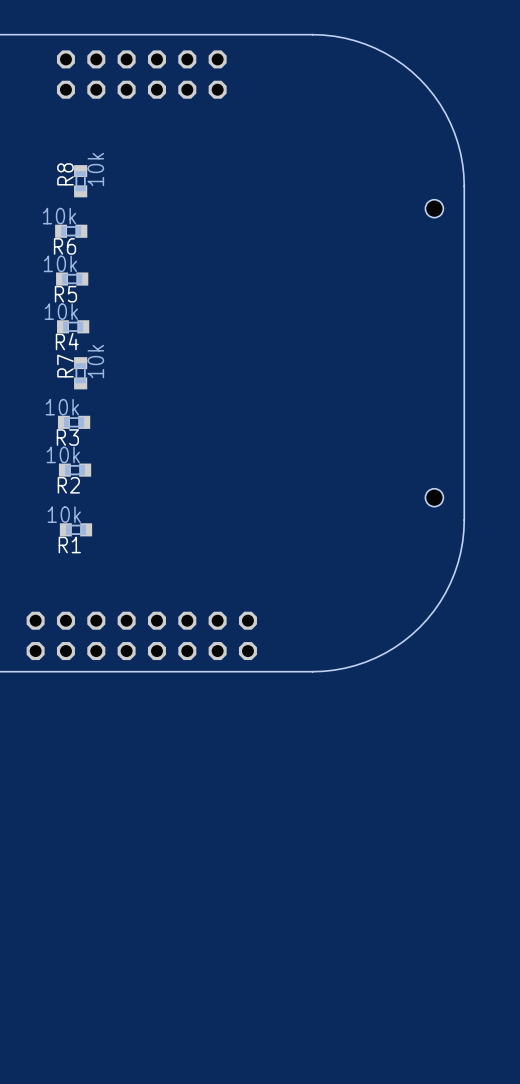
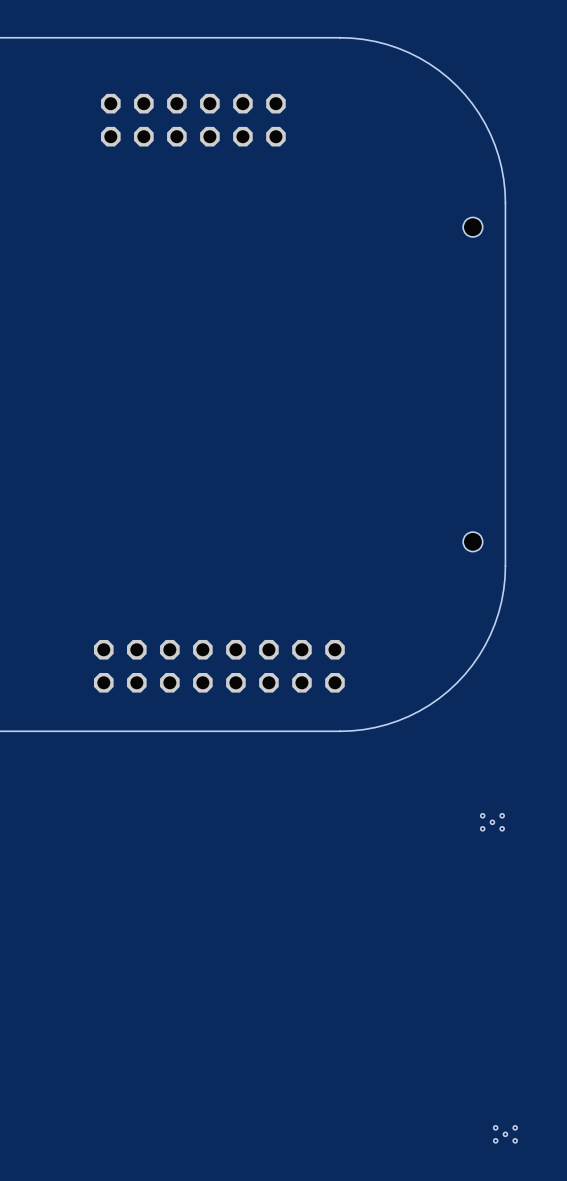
part position: (141, 74) -> (193, 120)
R8: 10k (80, 181) -> none
R6: 10k (71, 231) -> none
R5: 10k (72, 279) -> none
R4: 10k (73, 326) -> none
R7: 10k (80, 373) -> none
R3: 10k (74, 422) -> none
R2: 10k (75, 470) -> none
R1: 10k (75, 529) -> none
part position: (141, 635) -> (219, 666)
part: none -> (492, 822)
part: none -> (505, 1134)

